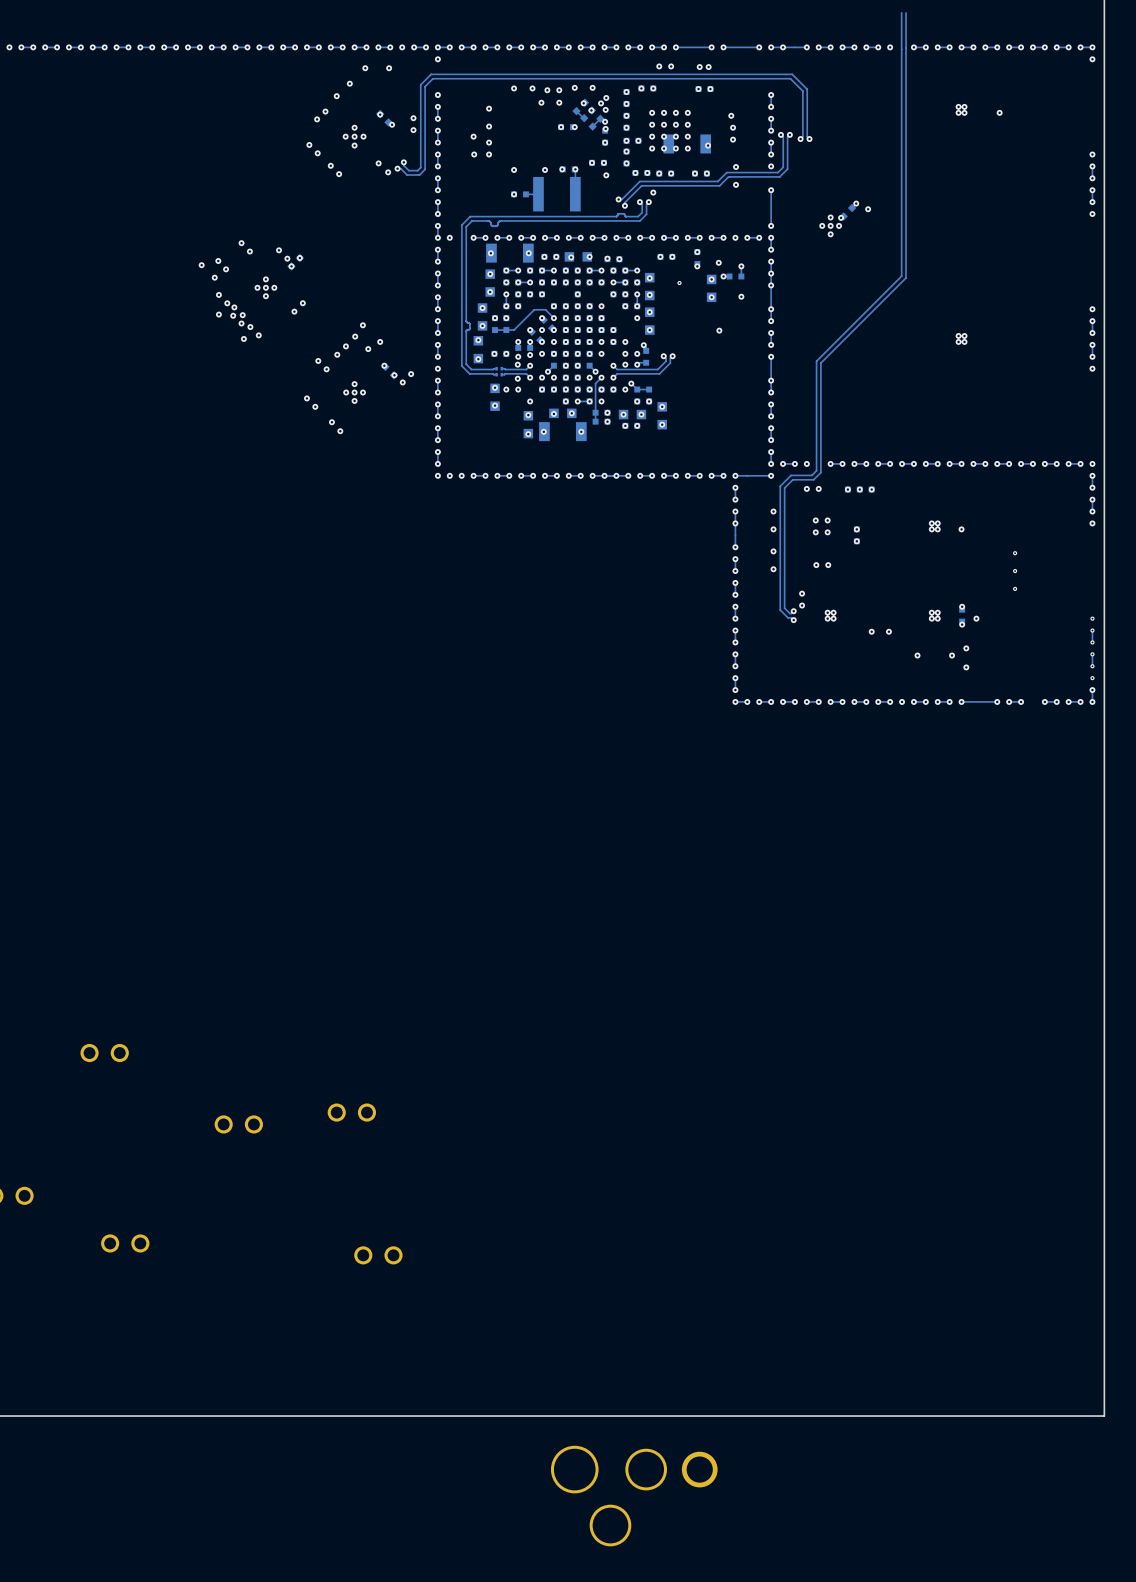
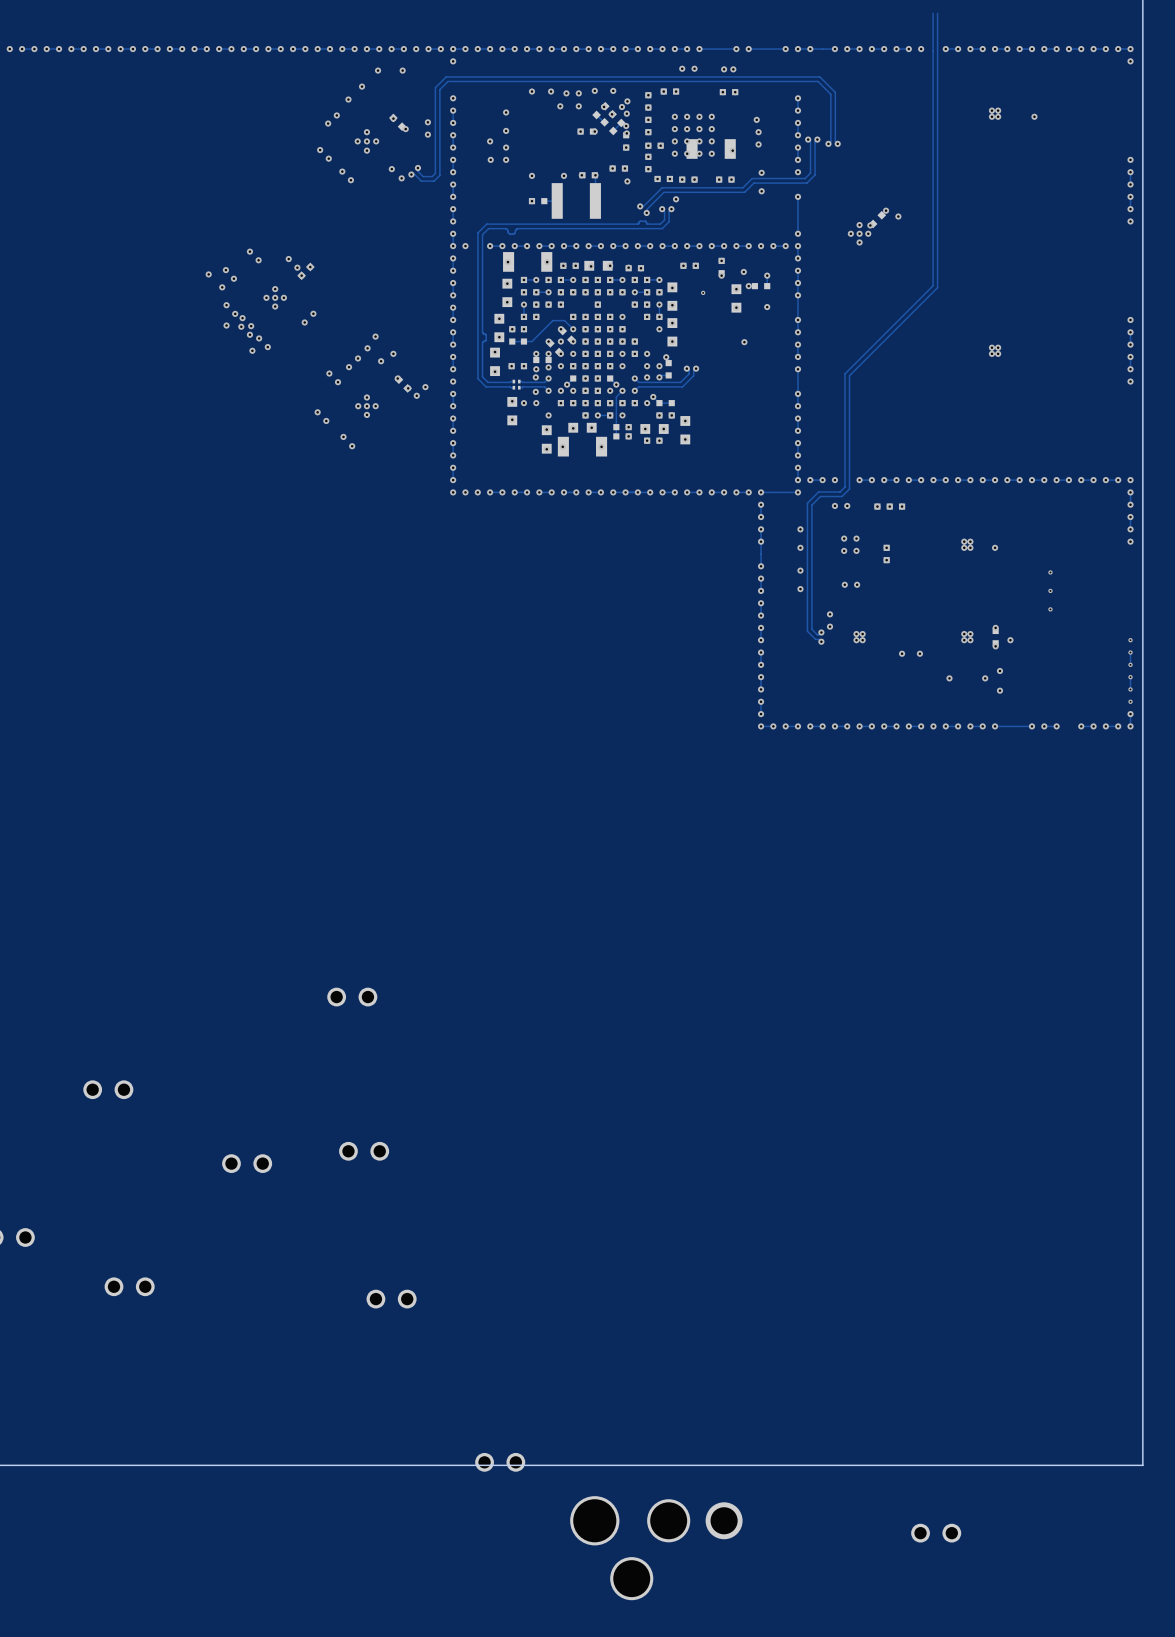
part: none -> (352, 997)
part: none -> (500, 1462)
part: none -> (936, 1533)

